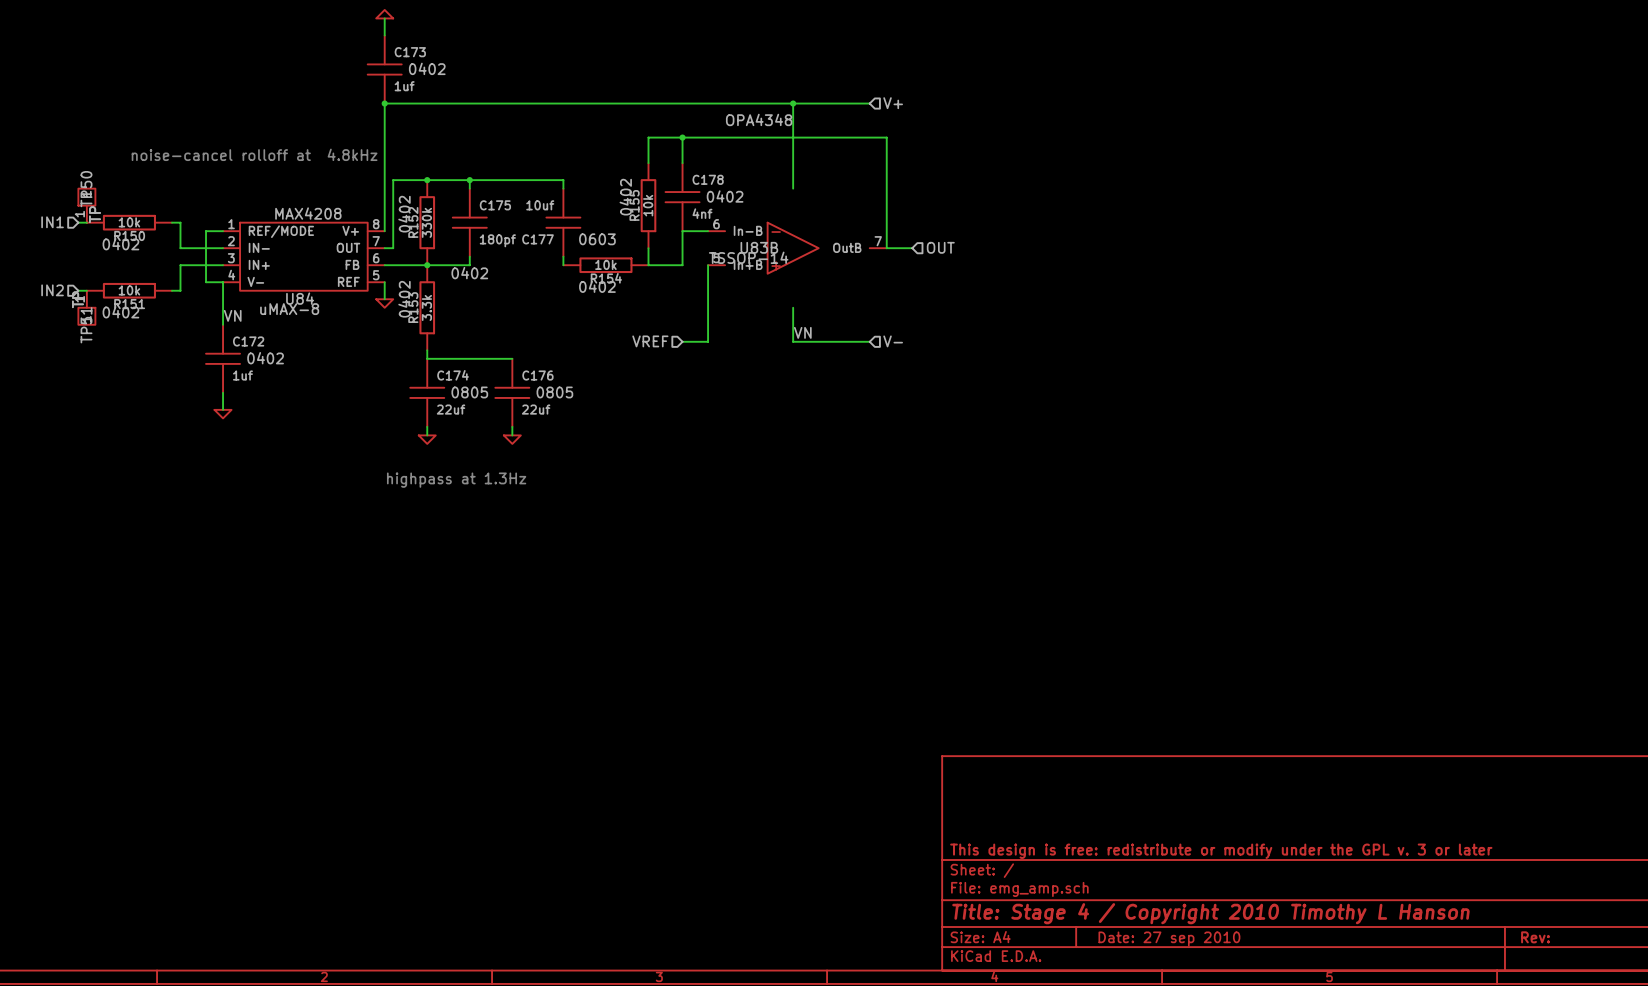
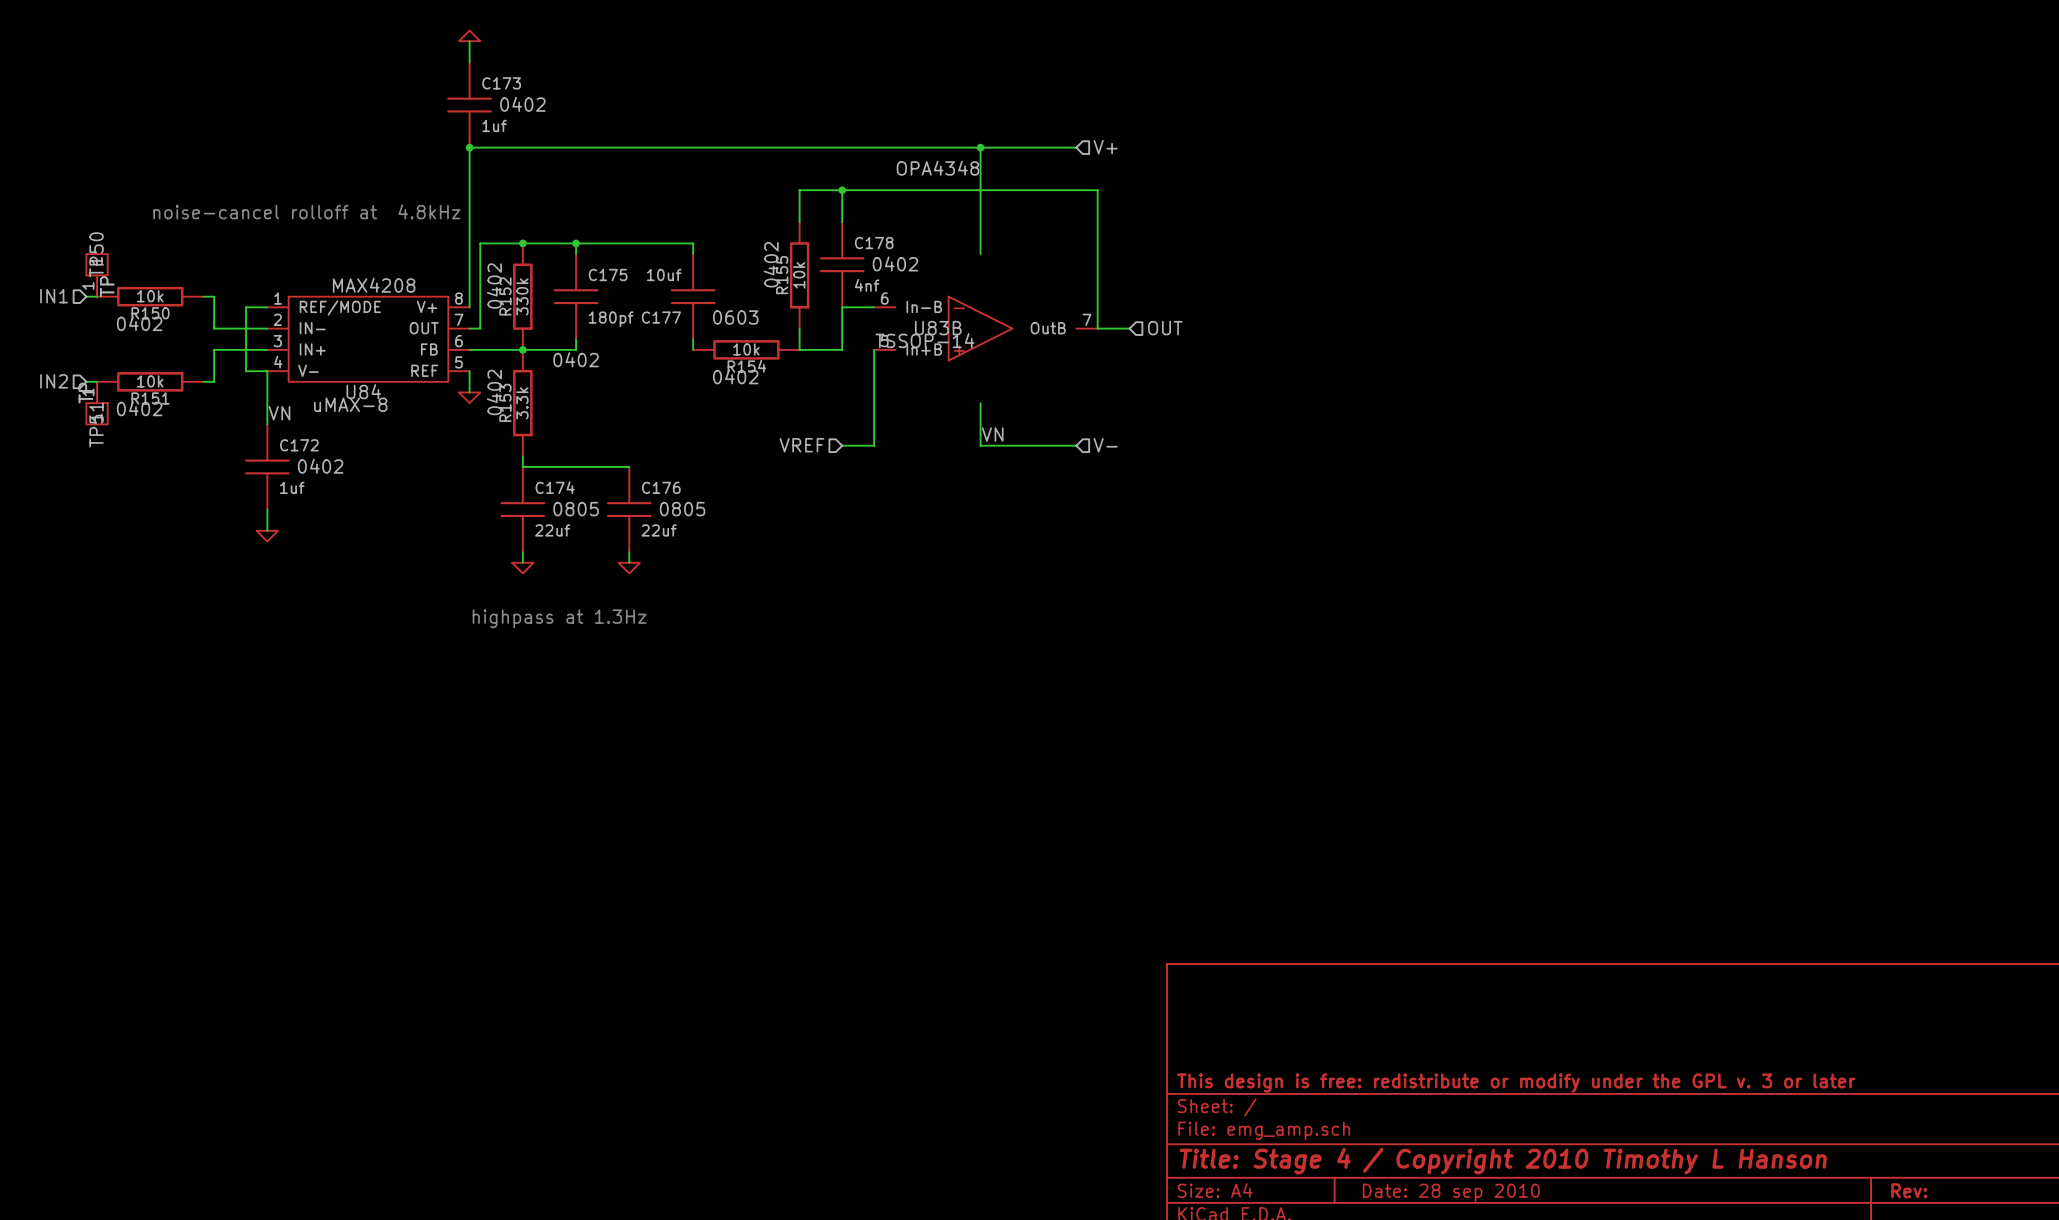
title block: Date: 27 sep 2010 (1169, 939) -> Date: 28 sep 2010 (1451, 1192)

